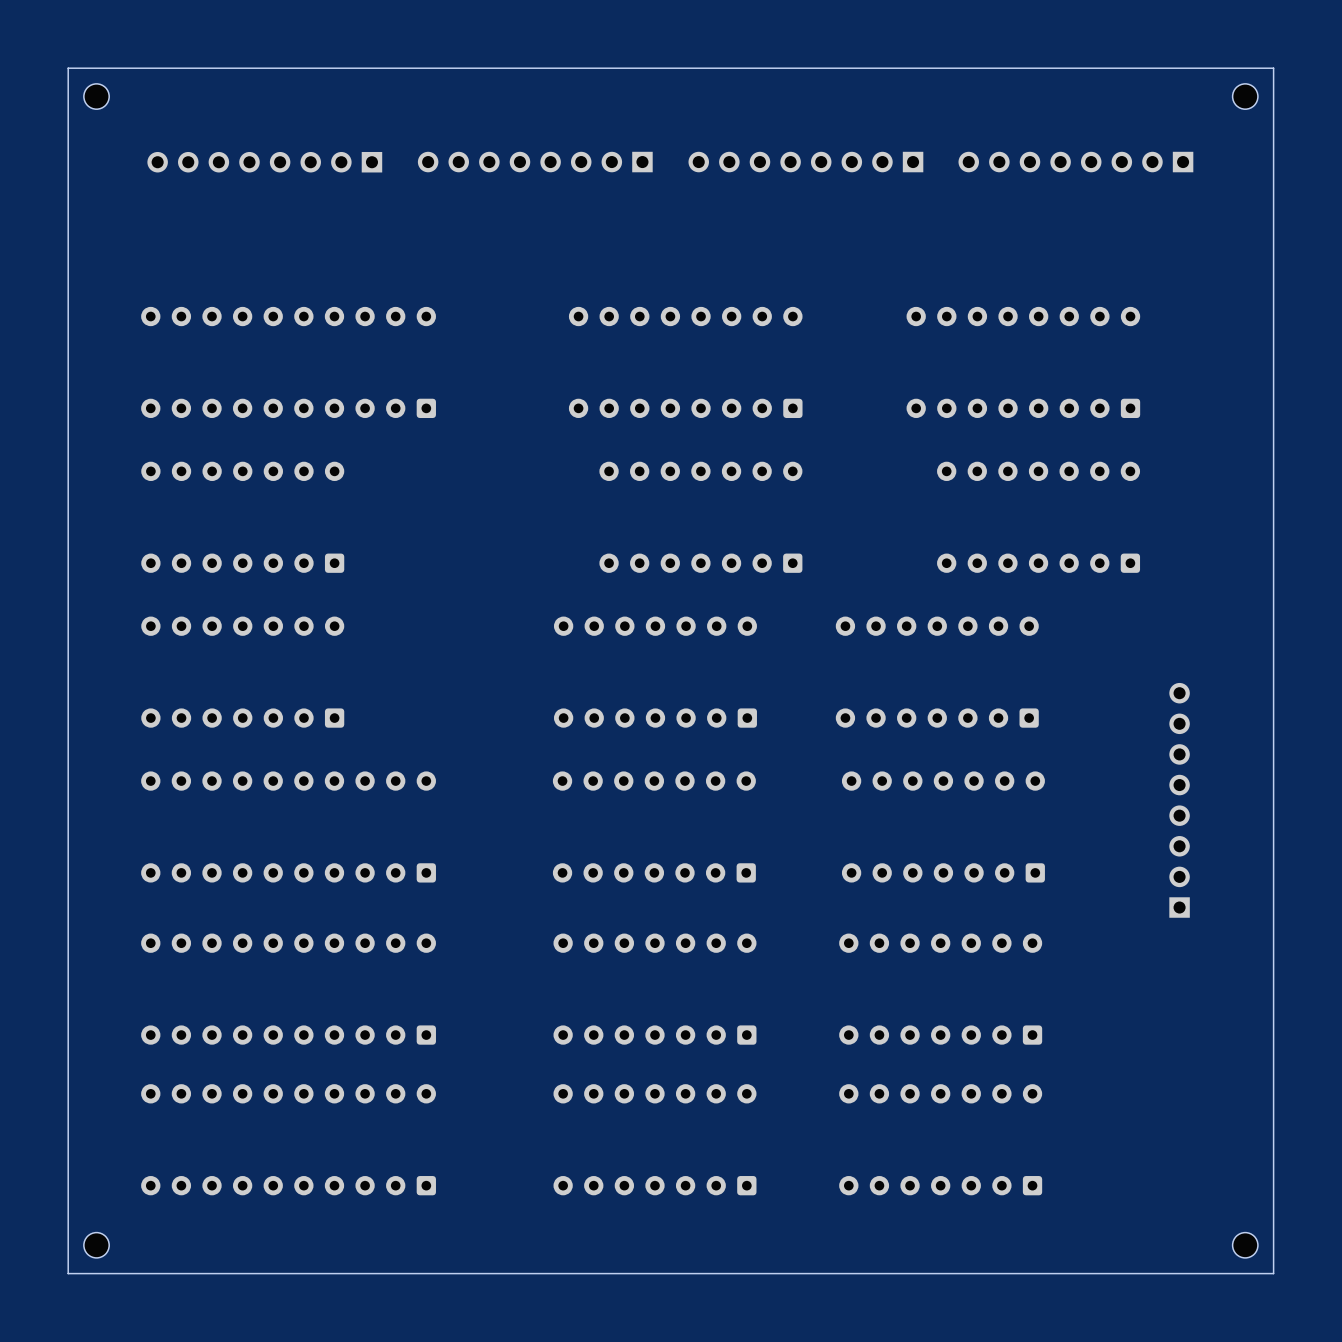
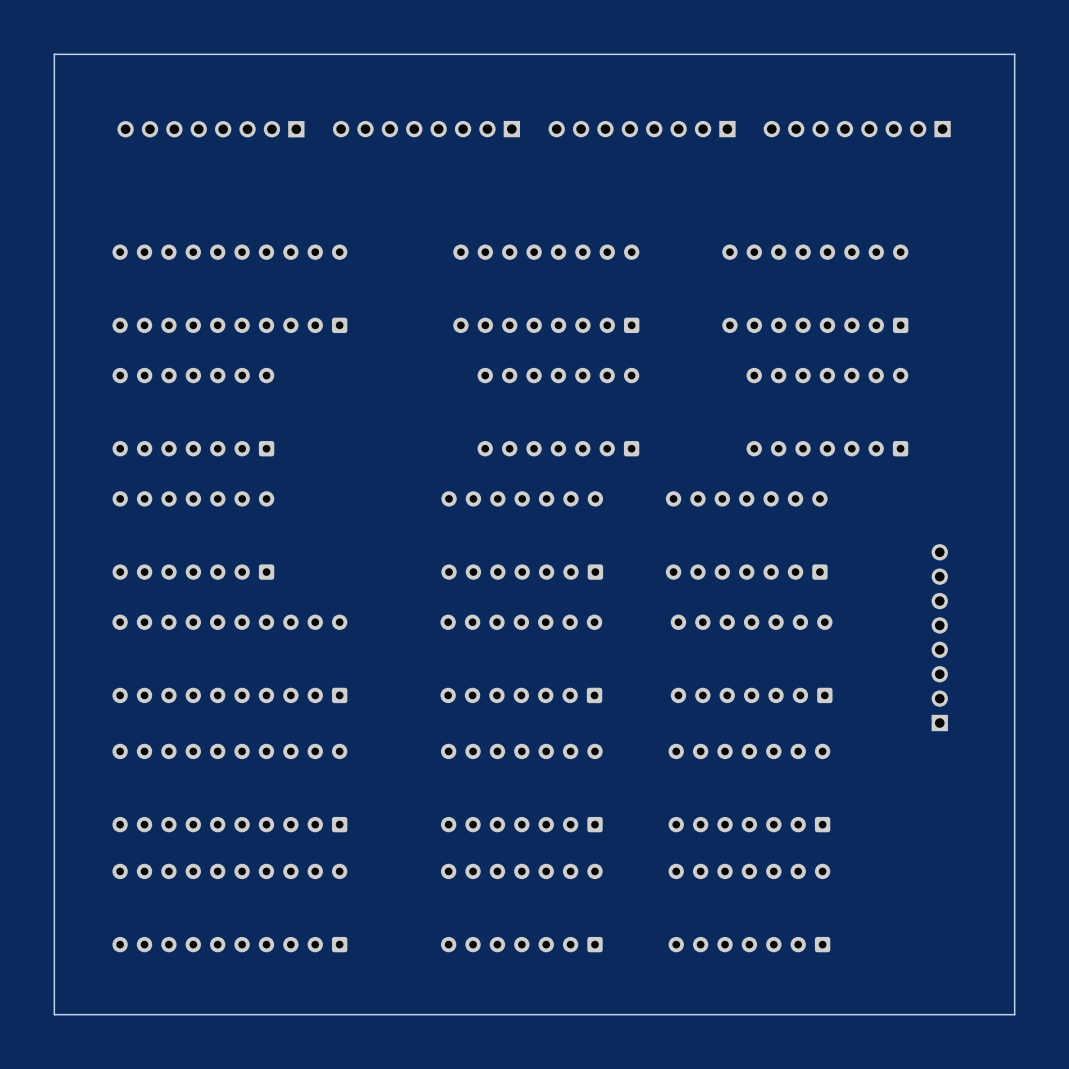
part: (96, 96) -> none
part: (1245, 96) -> none
part: (96, 1245) -> none
part: (1245, 1245) -> none

